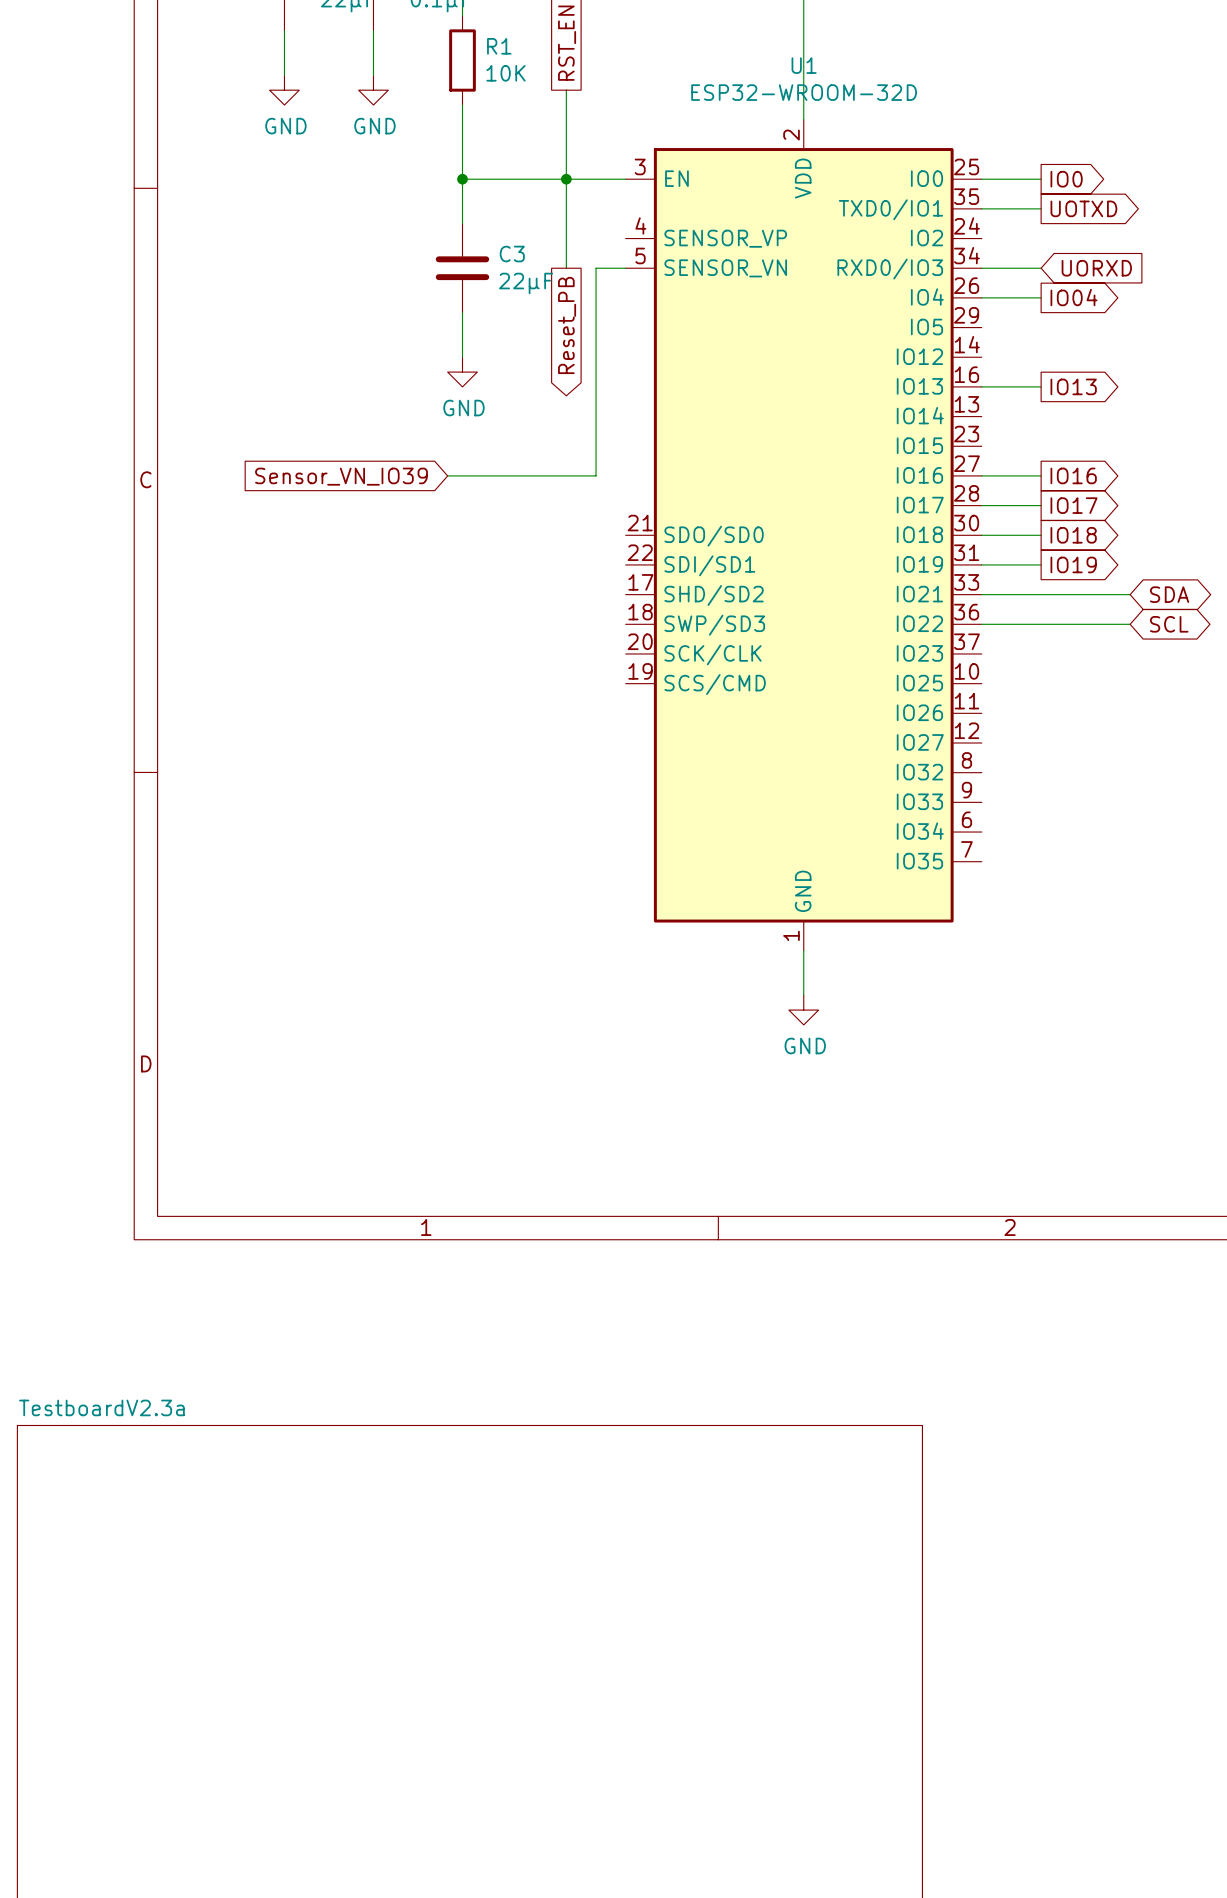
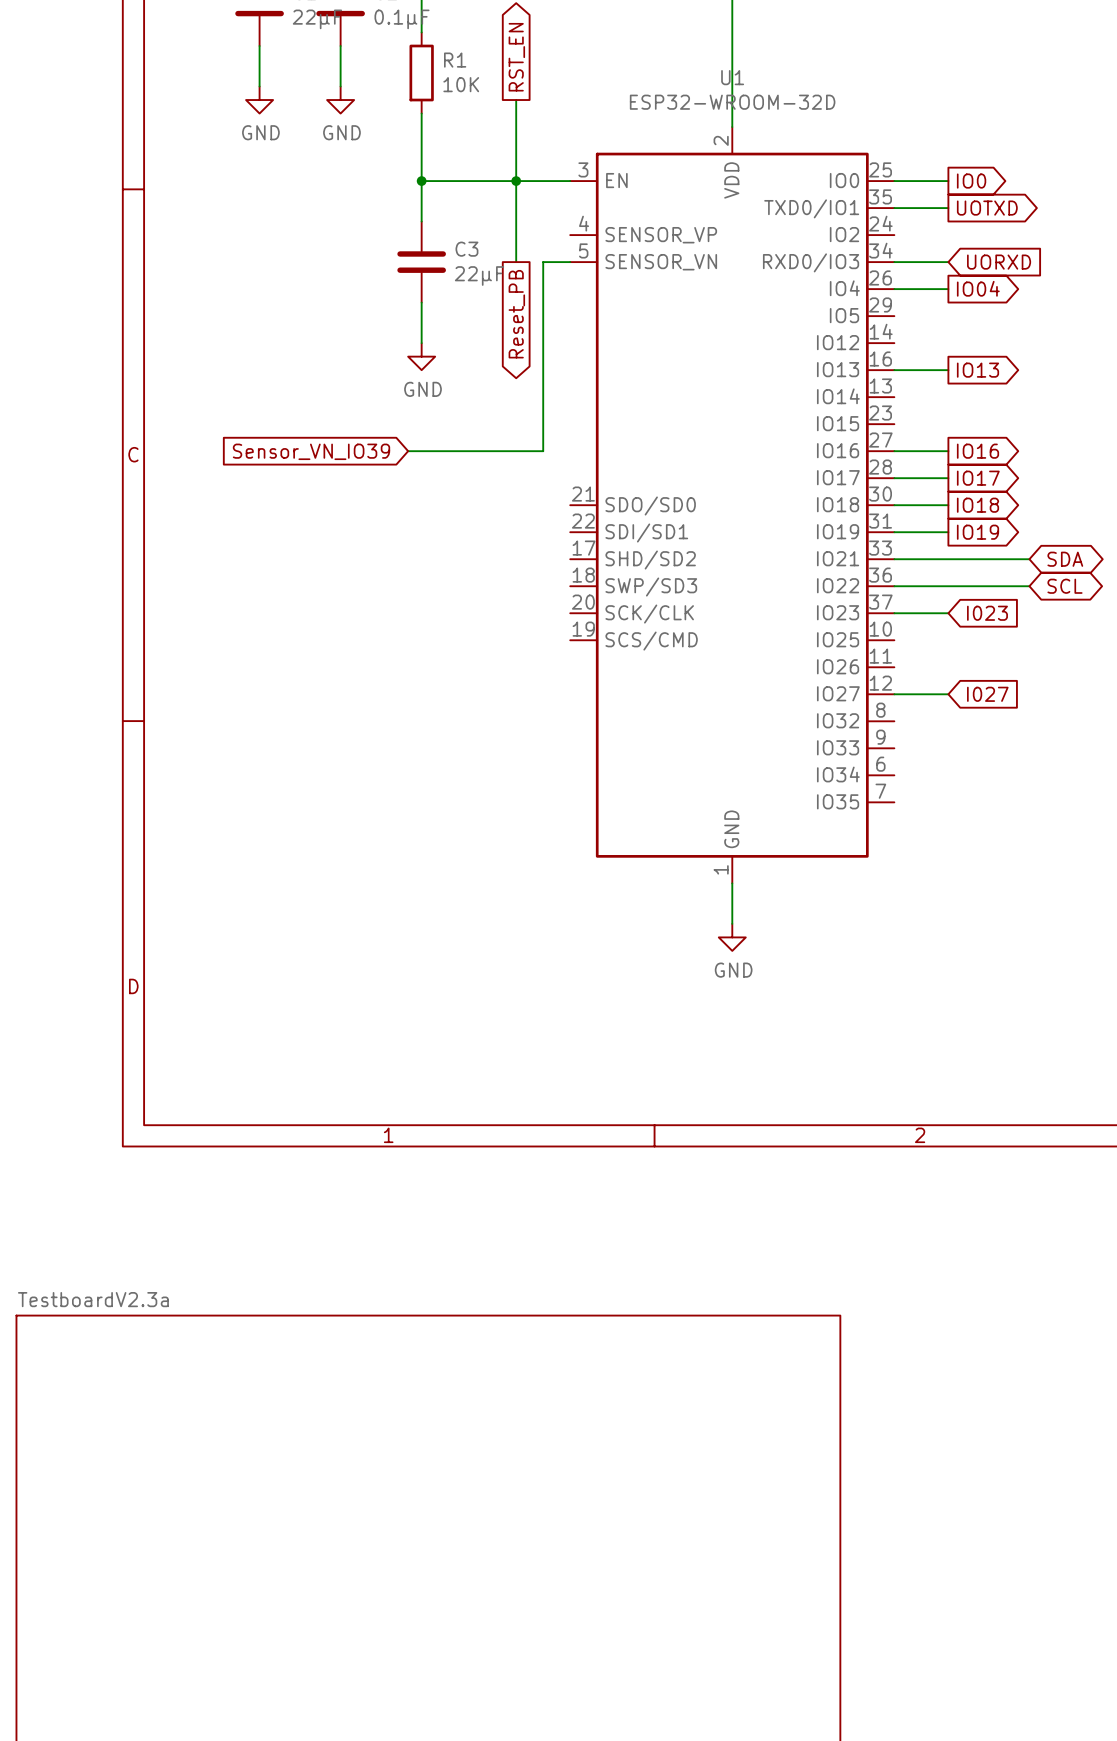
wire: none -> (894, 613) (948, 613)
global label: none -> I023 (987, 613)
wire: none -> (894, 694) (948, 694)
global label: none -> I027 (987, 694)

